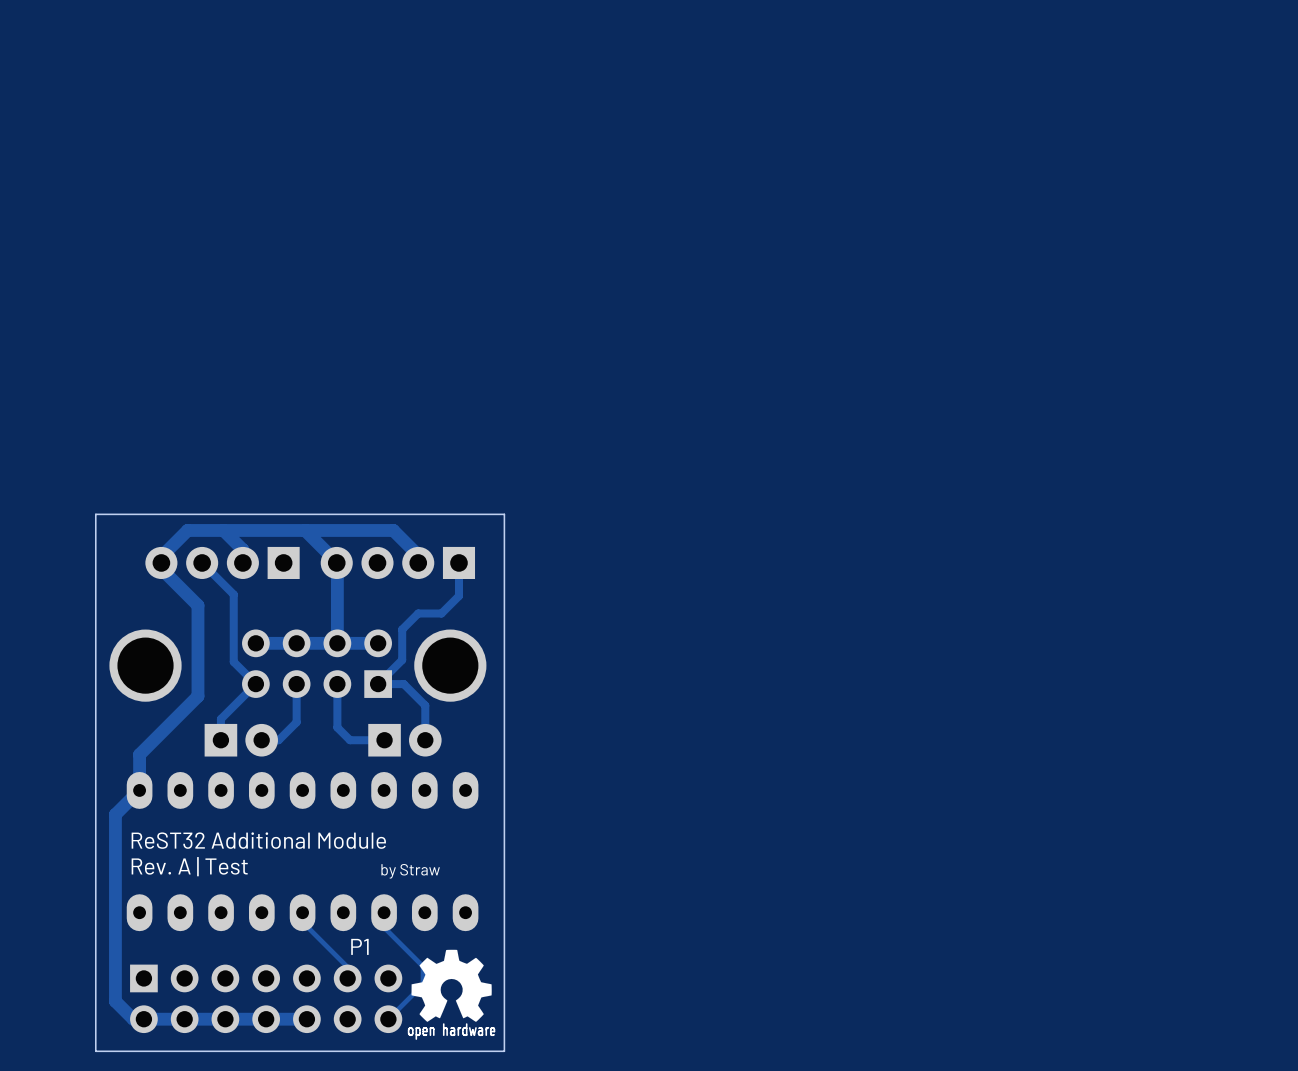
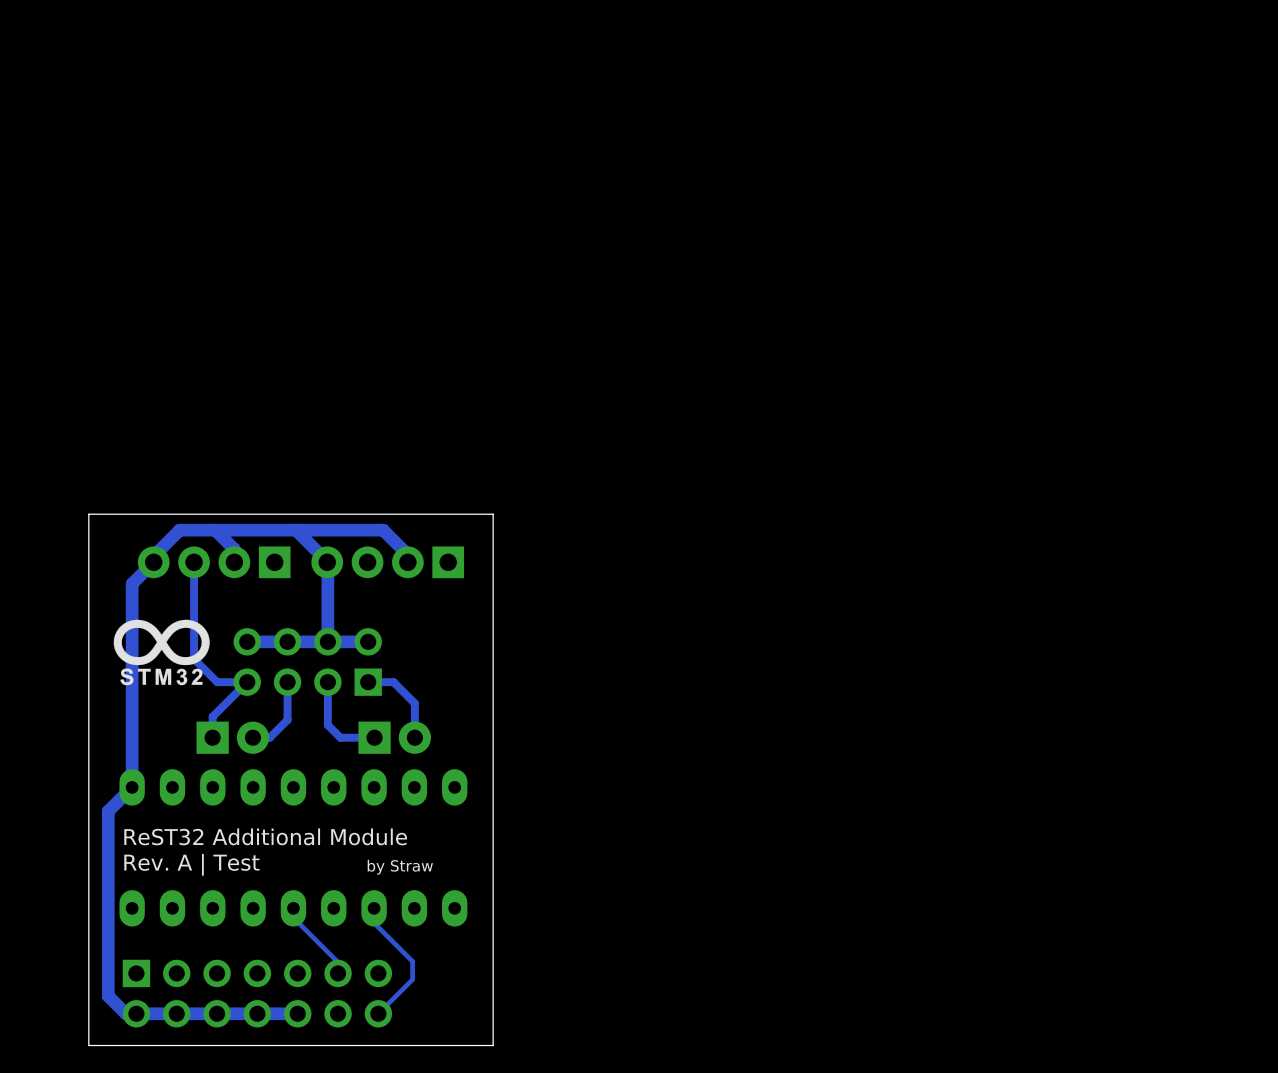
track: (202, 562) (233, 594) (233, 661) (255, 684) -> (194, 562) (194, 658) (217, 682) (247, 682)
track: (458, 562) (458, 596) (441, 613) (418, 613) (402, 629) (402, 660) (378, 684) -> none
track: (161, 568) (197, 605) (197, 696) (139, 754) -> (153, 562) (132, 583) (132, 752)
drawing: none -> [113, 619, 210, 686]
part: (145, 665) -> none
part: (450, 665) -> none
P1 name: P1 (359, 946) -> none
drawing: [408, 949, 496, 1040] -> none

